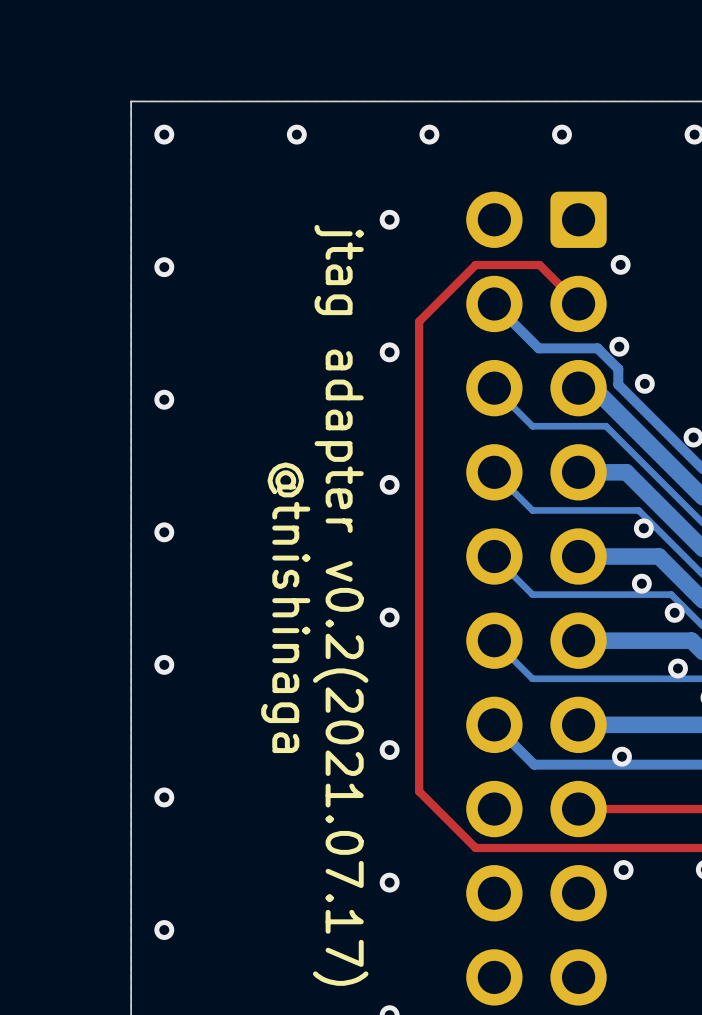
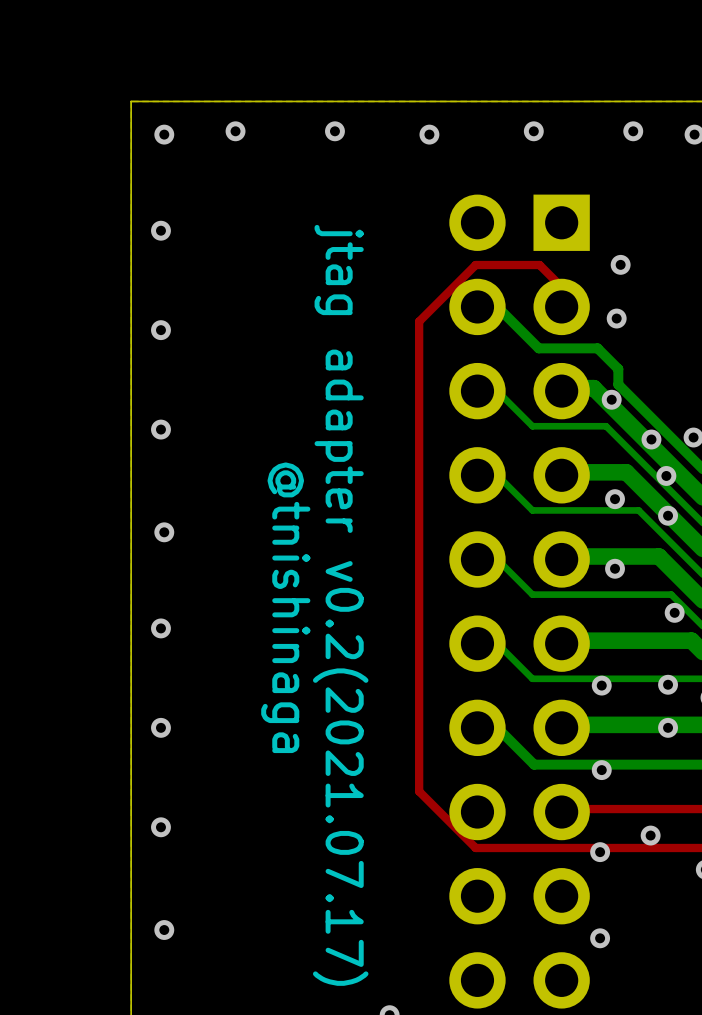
via: none -> (235, 131)
via: none -> (334, 131)
via: none -> (633, 131)
via: (296, 134) -> none
via position: (561, 134) -> (533, 131)
part footprint: [466, 191, 607, 1006] -> [449, 194, 590, 1009]
via: (389, 219) -> none
via: none -> (160, 230)
via: (164, 267) -> none
via: none -> (616, 318)
via: none -> (160, 330)
via: (619, 346) -> none
via: (389, 352) -> none
via: (644, 383) -> none
via position: (164, 399) -> (160, 429)
via: none -> (611, 399)
via: none -> (651, 439)
via: none -> (666, 475)
via: (389, 484) -> none
via: none -> (615, 499)
via: none -> (668, 515)
via: (643, 528) -> none
via: none -> (615, 568)
via: (641, 583) -> none
via: (389, 617) -> none
via: none -> (160, 628)
via: (164, 664) -> none
via position: (677, 668) -> (668, 684)
via: none -> (601, 685)
via: none -> (160, 727)
via: none -> (668, 727)
via: (389, 750) -> none
via position: (621, 756) -> (601, 770)
via position: (164, 797) -> (160, 827)
via: none -> (650, 835)
via: none -> (600, 852)
via: (623, 870) -> none
via: (389, 882) -> none
via: none -> (600, 938)

